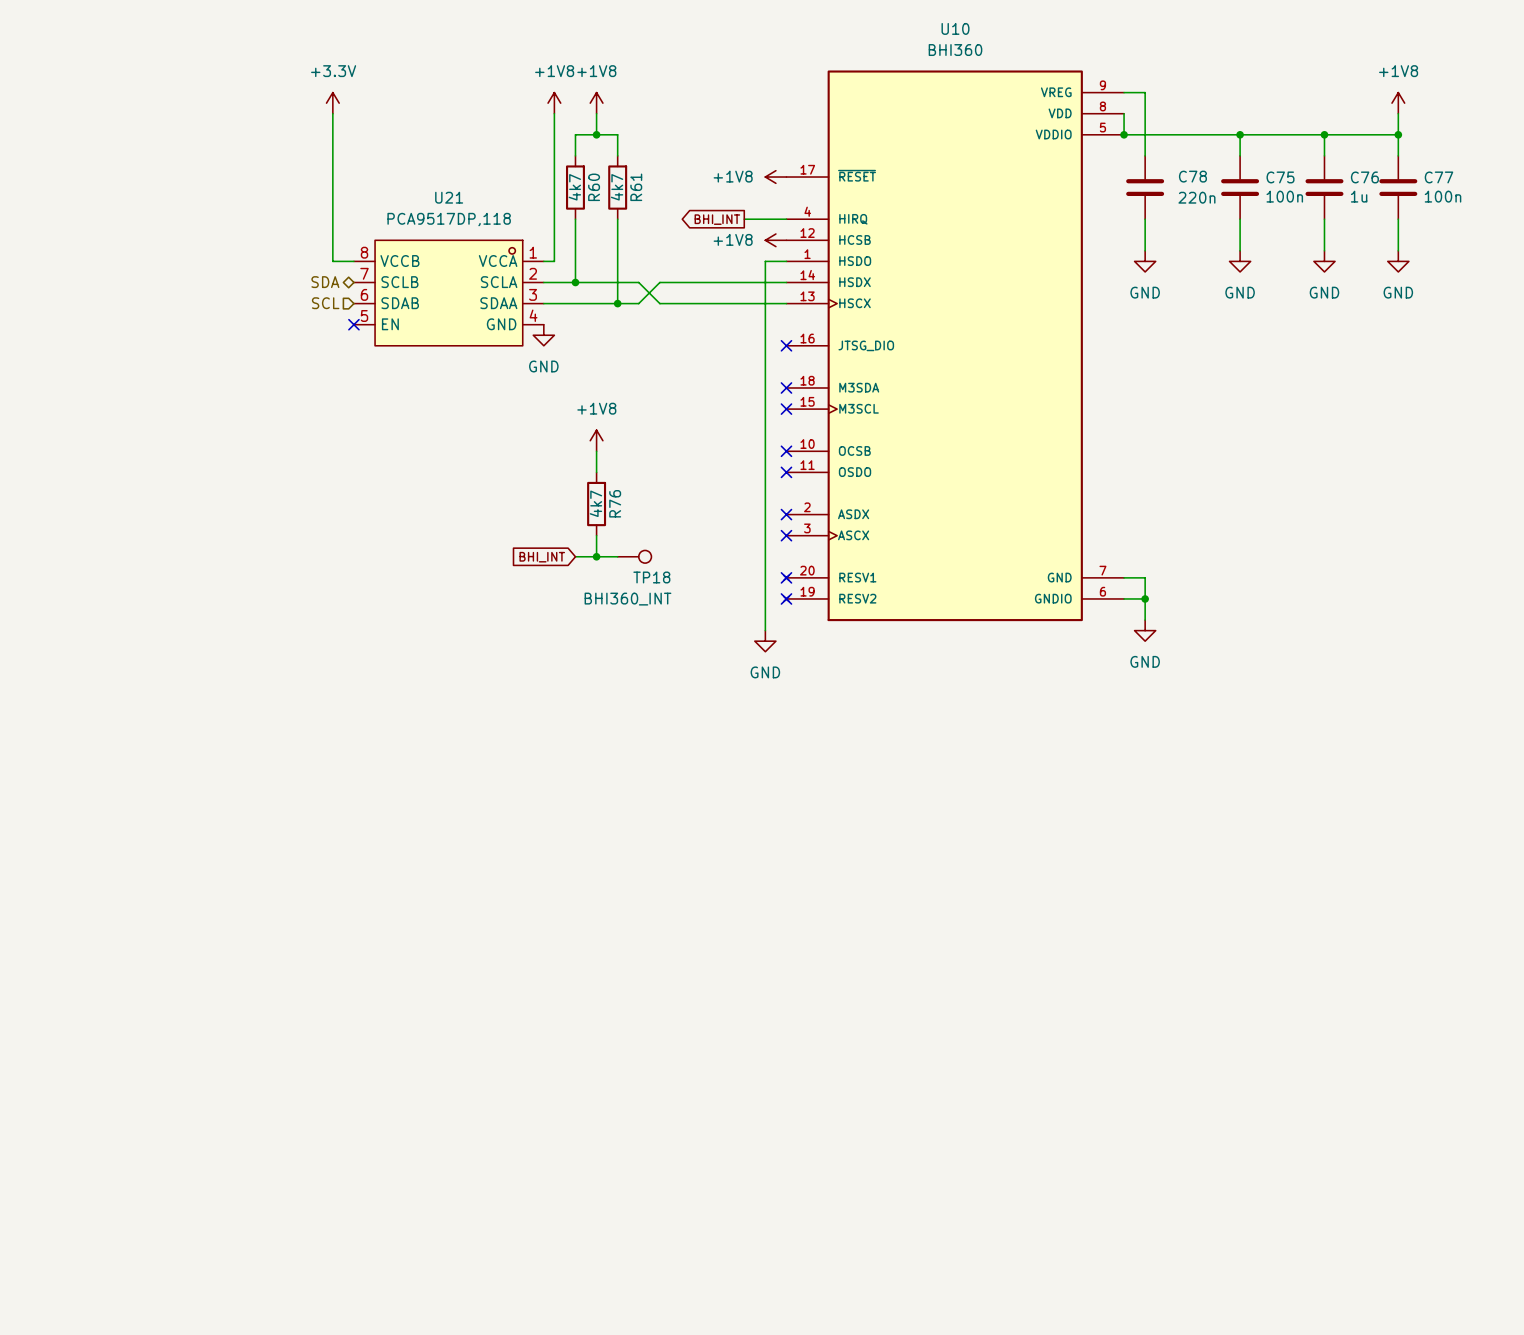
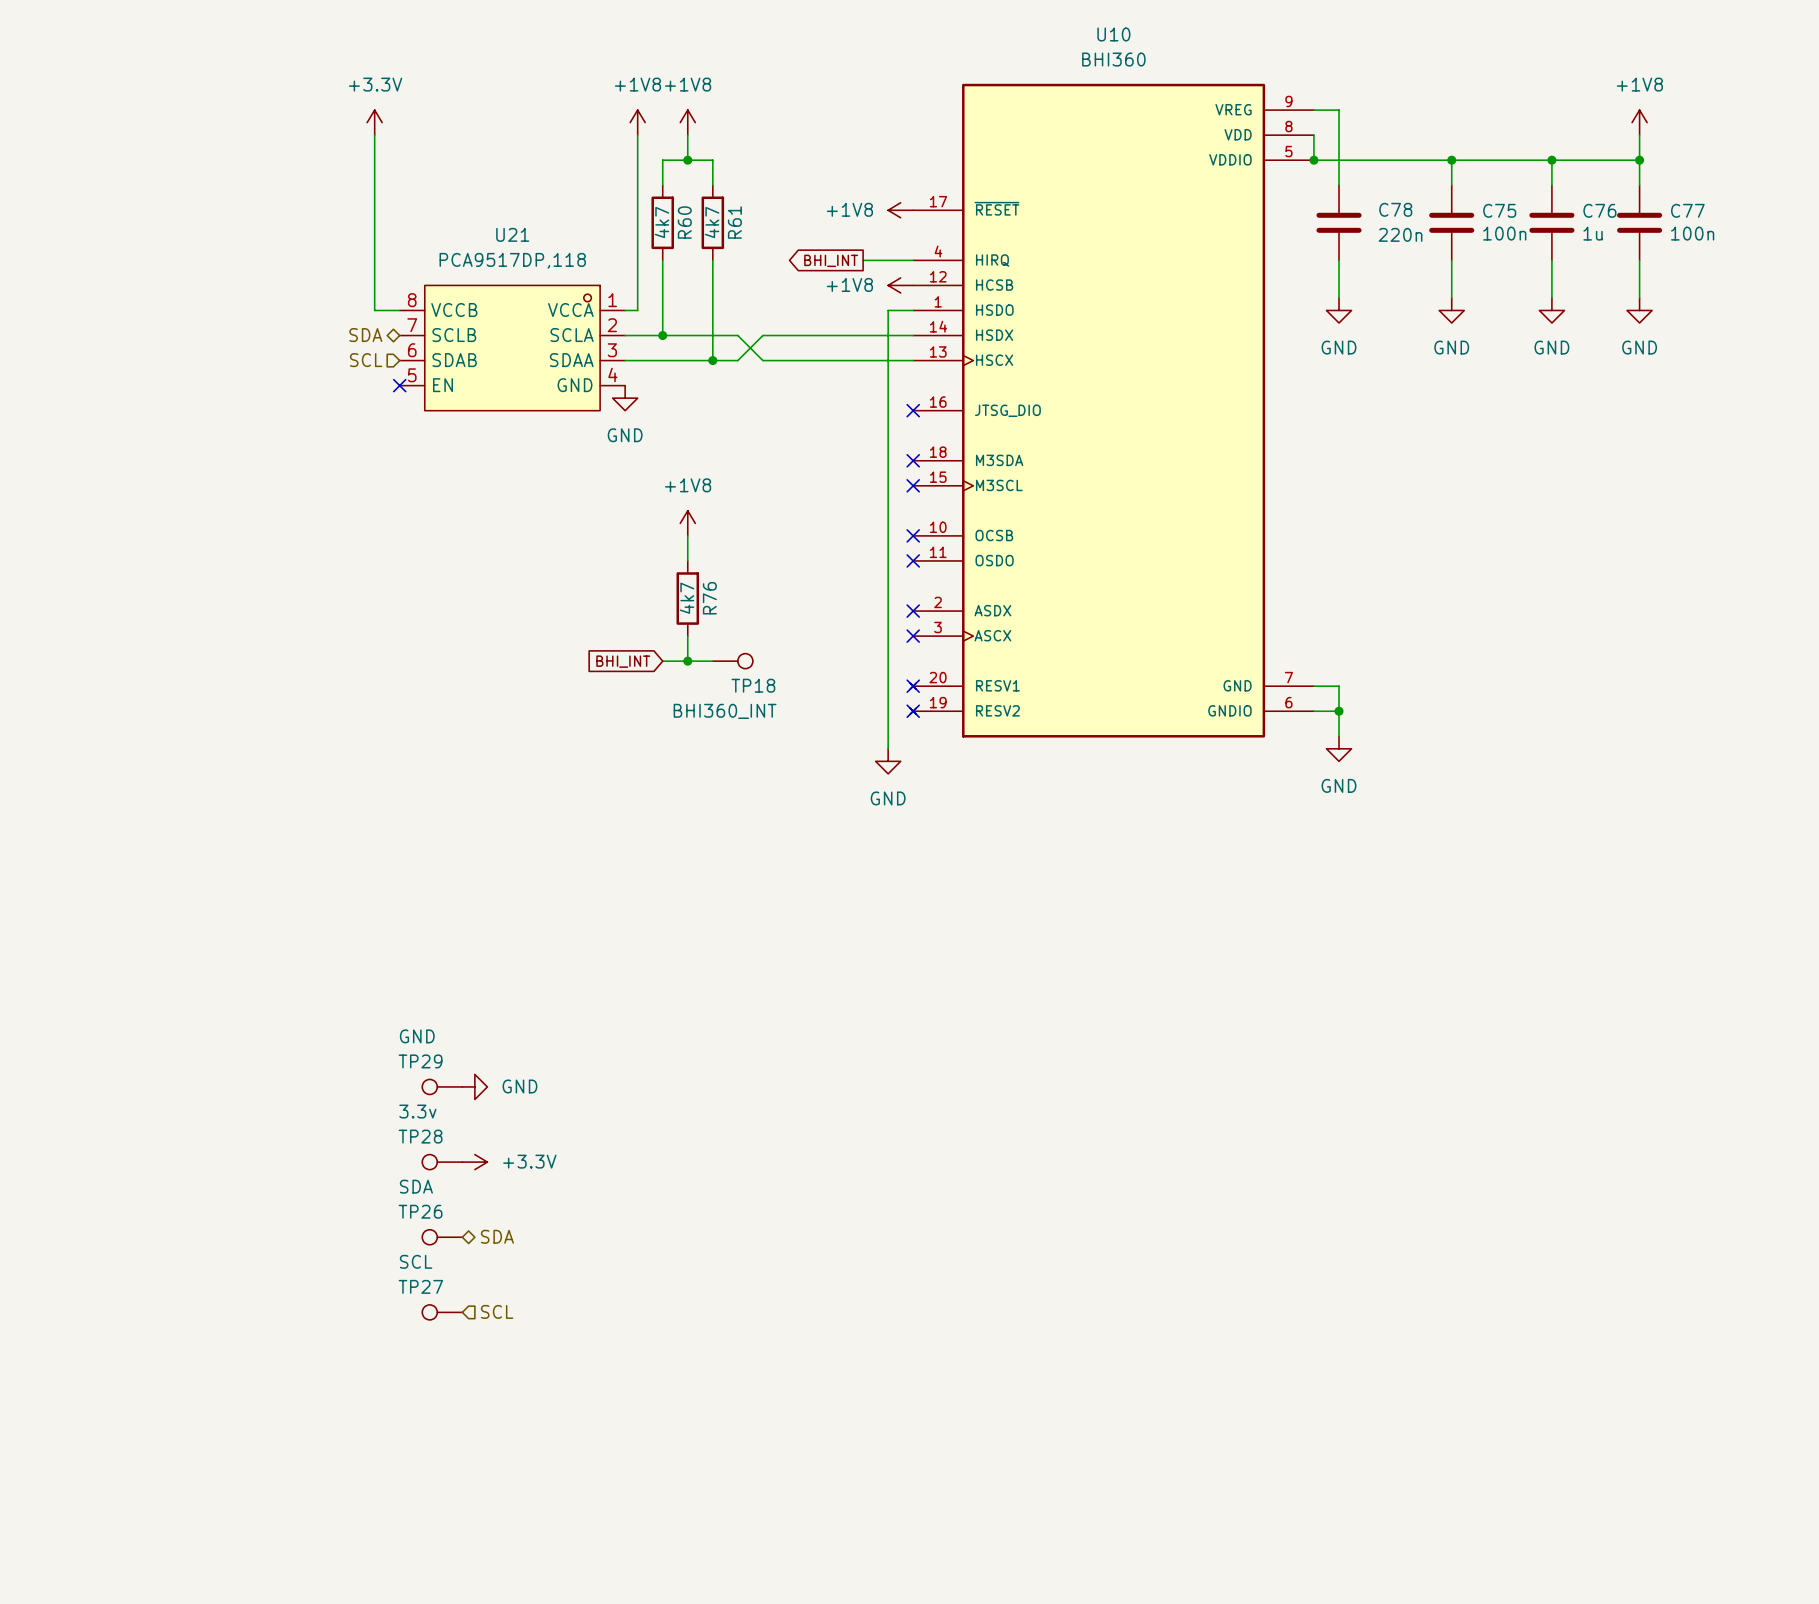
TP29: none -> GND (442, 1086)
power symbol: none -> GND (474, 1086)
TP28: none -> 3.3v (442, 1162)
power symbol: none -> +3.3V (474, 1162)
hierarchical label: none -> SDA (497, 1236)
TP26: none -> SDA (442, 1237)
hierarchical label: none -> SCL (497, 1311)
TP27: none -> SCL (442, 1312)

